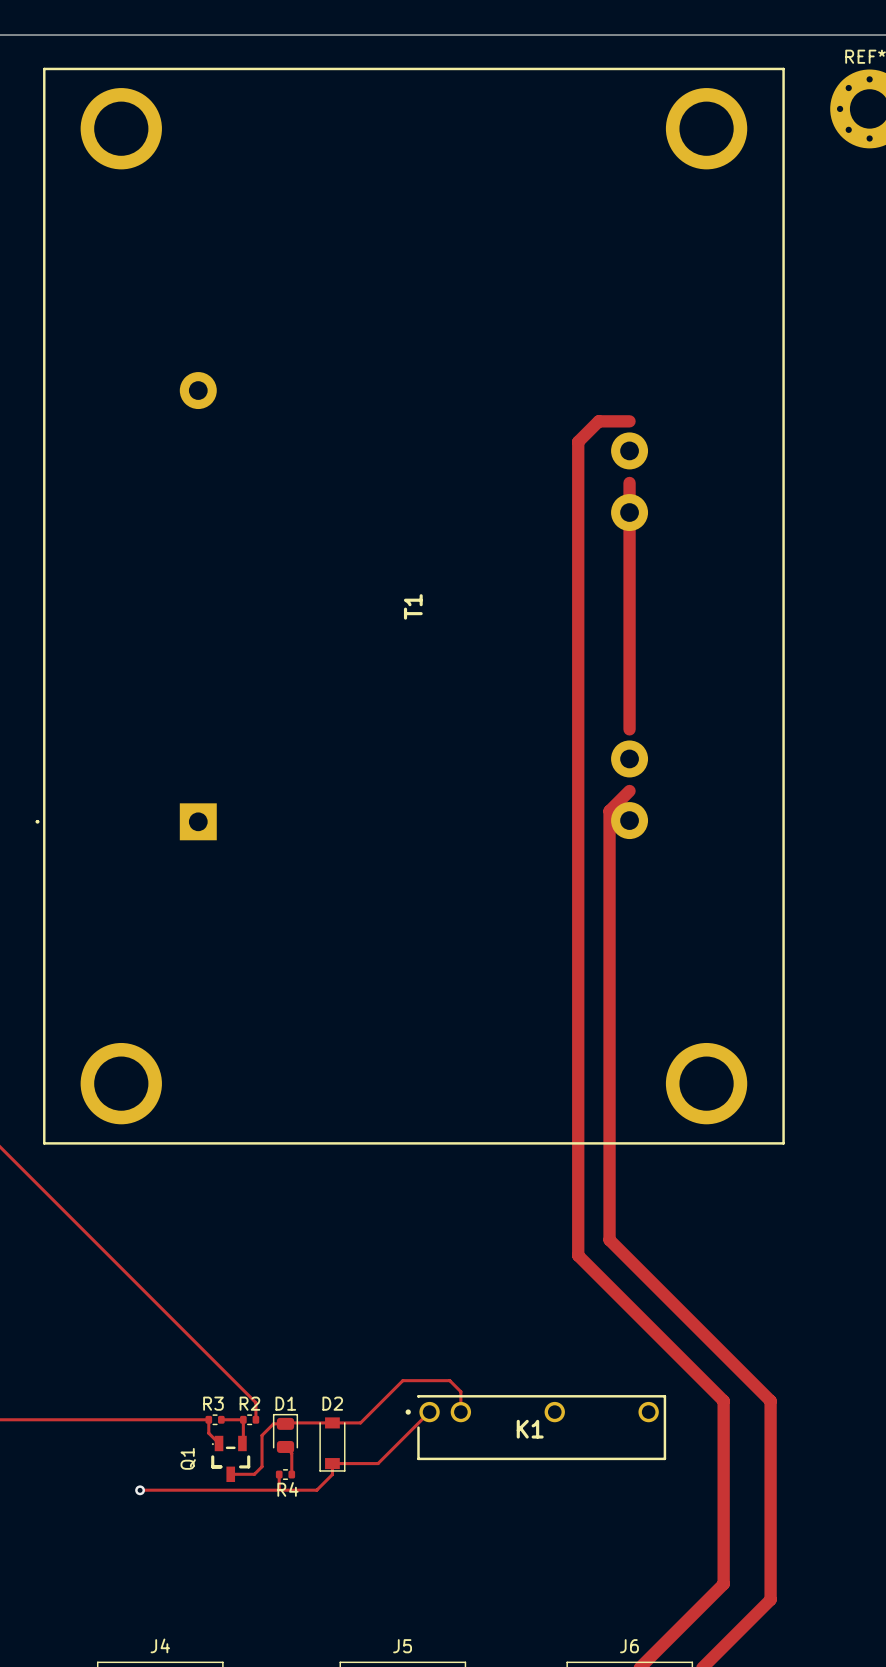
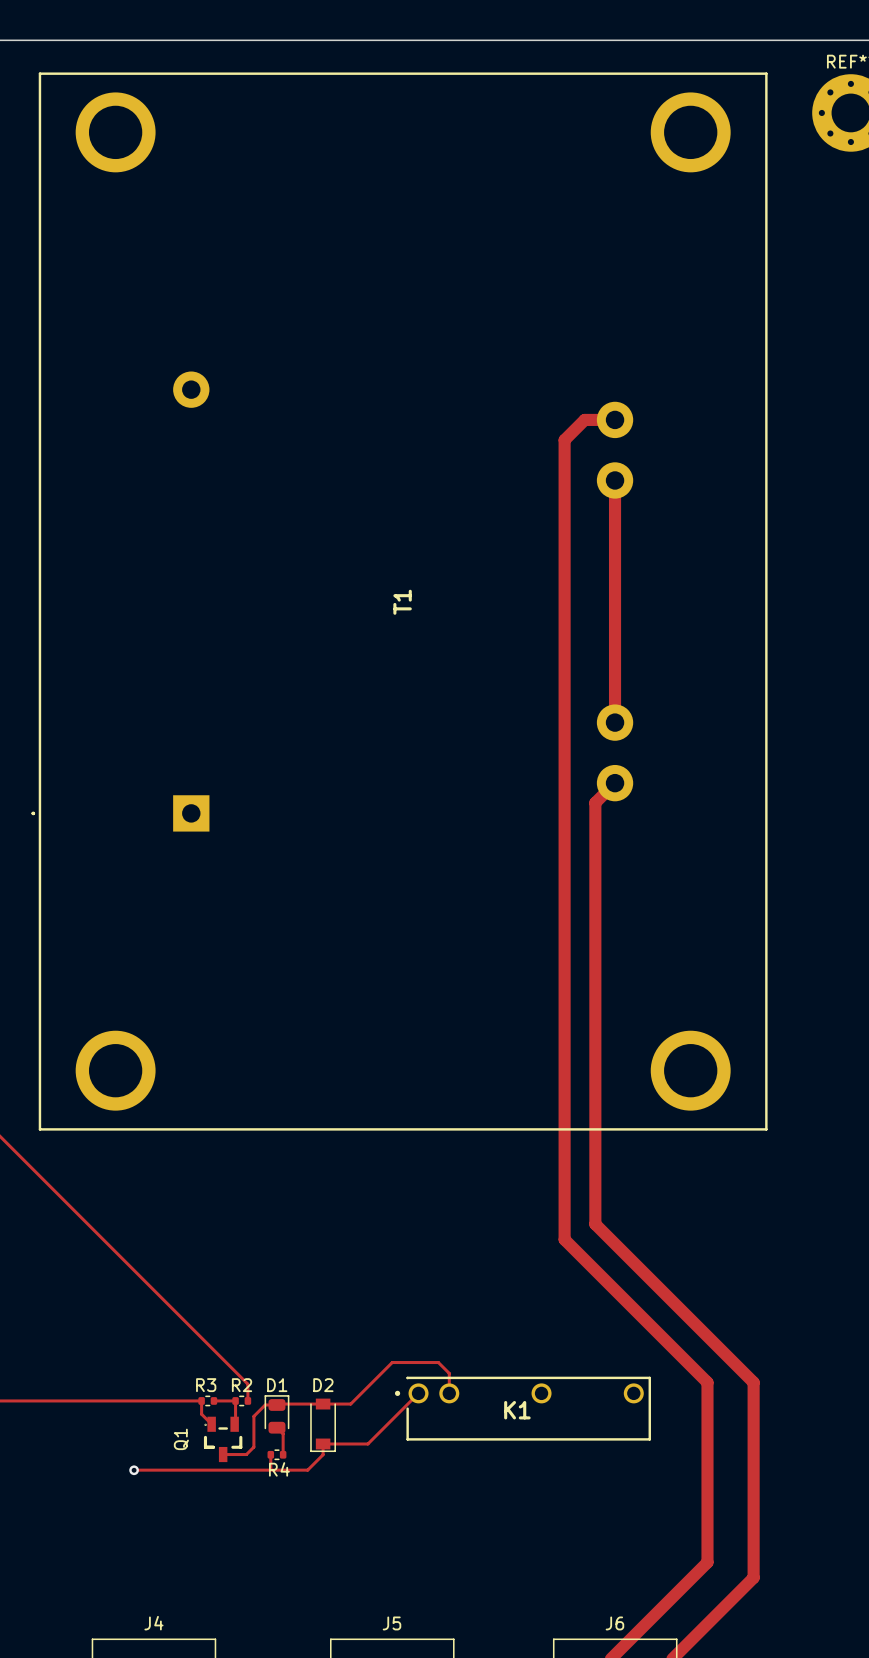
T1 footprint: [35, 67, 785, 1145] -> [31, 72, 768, 1131]

